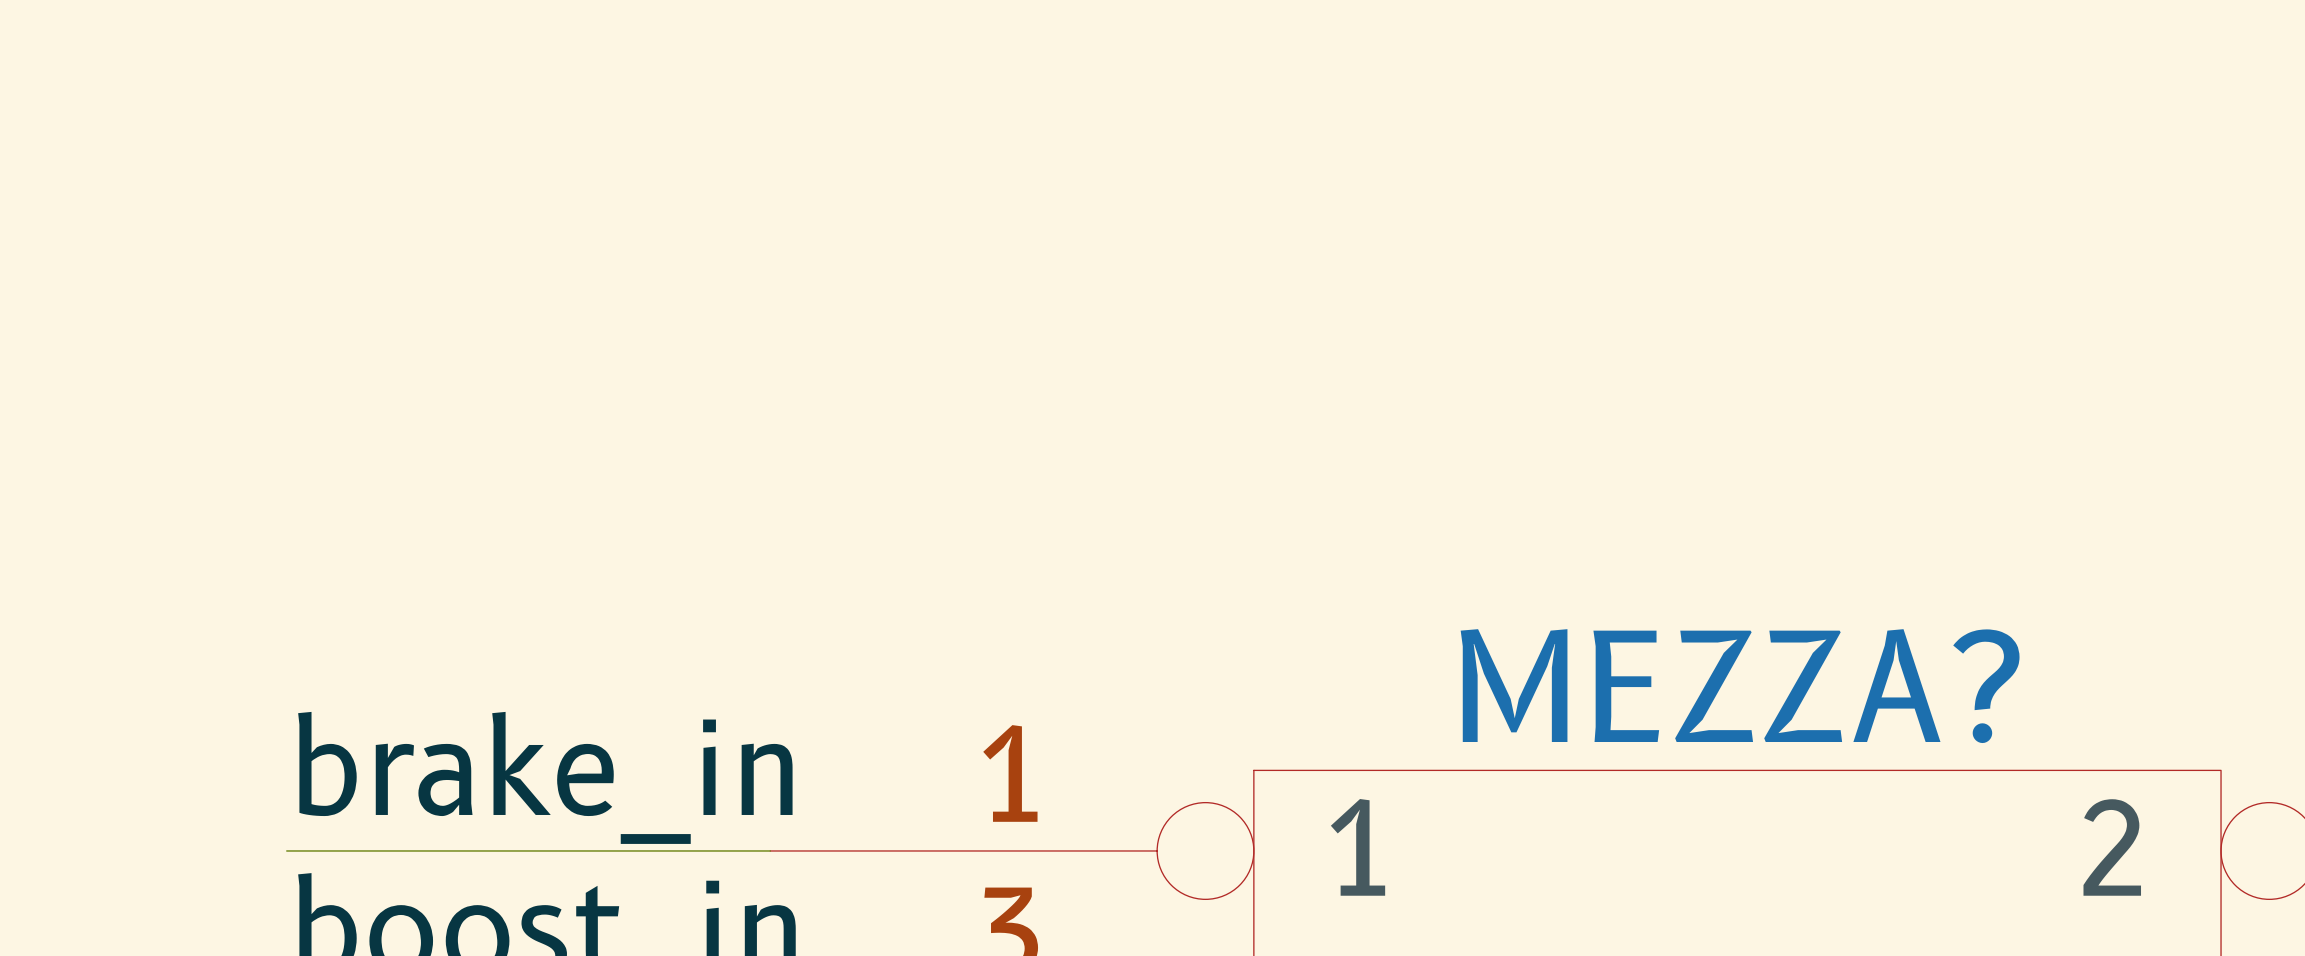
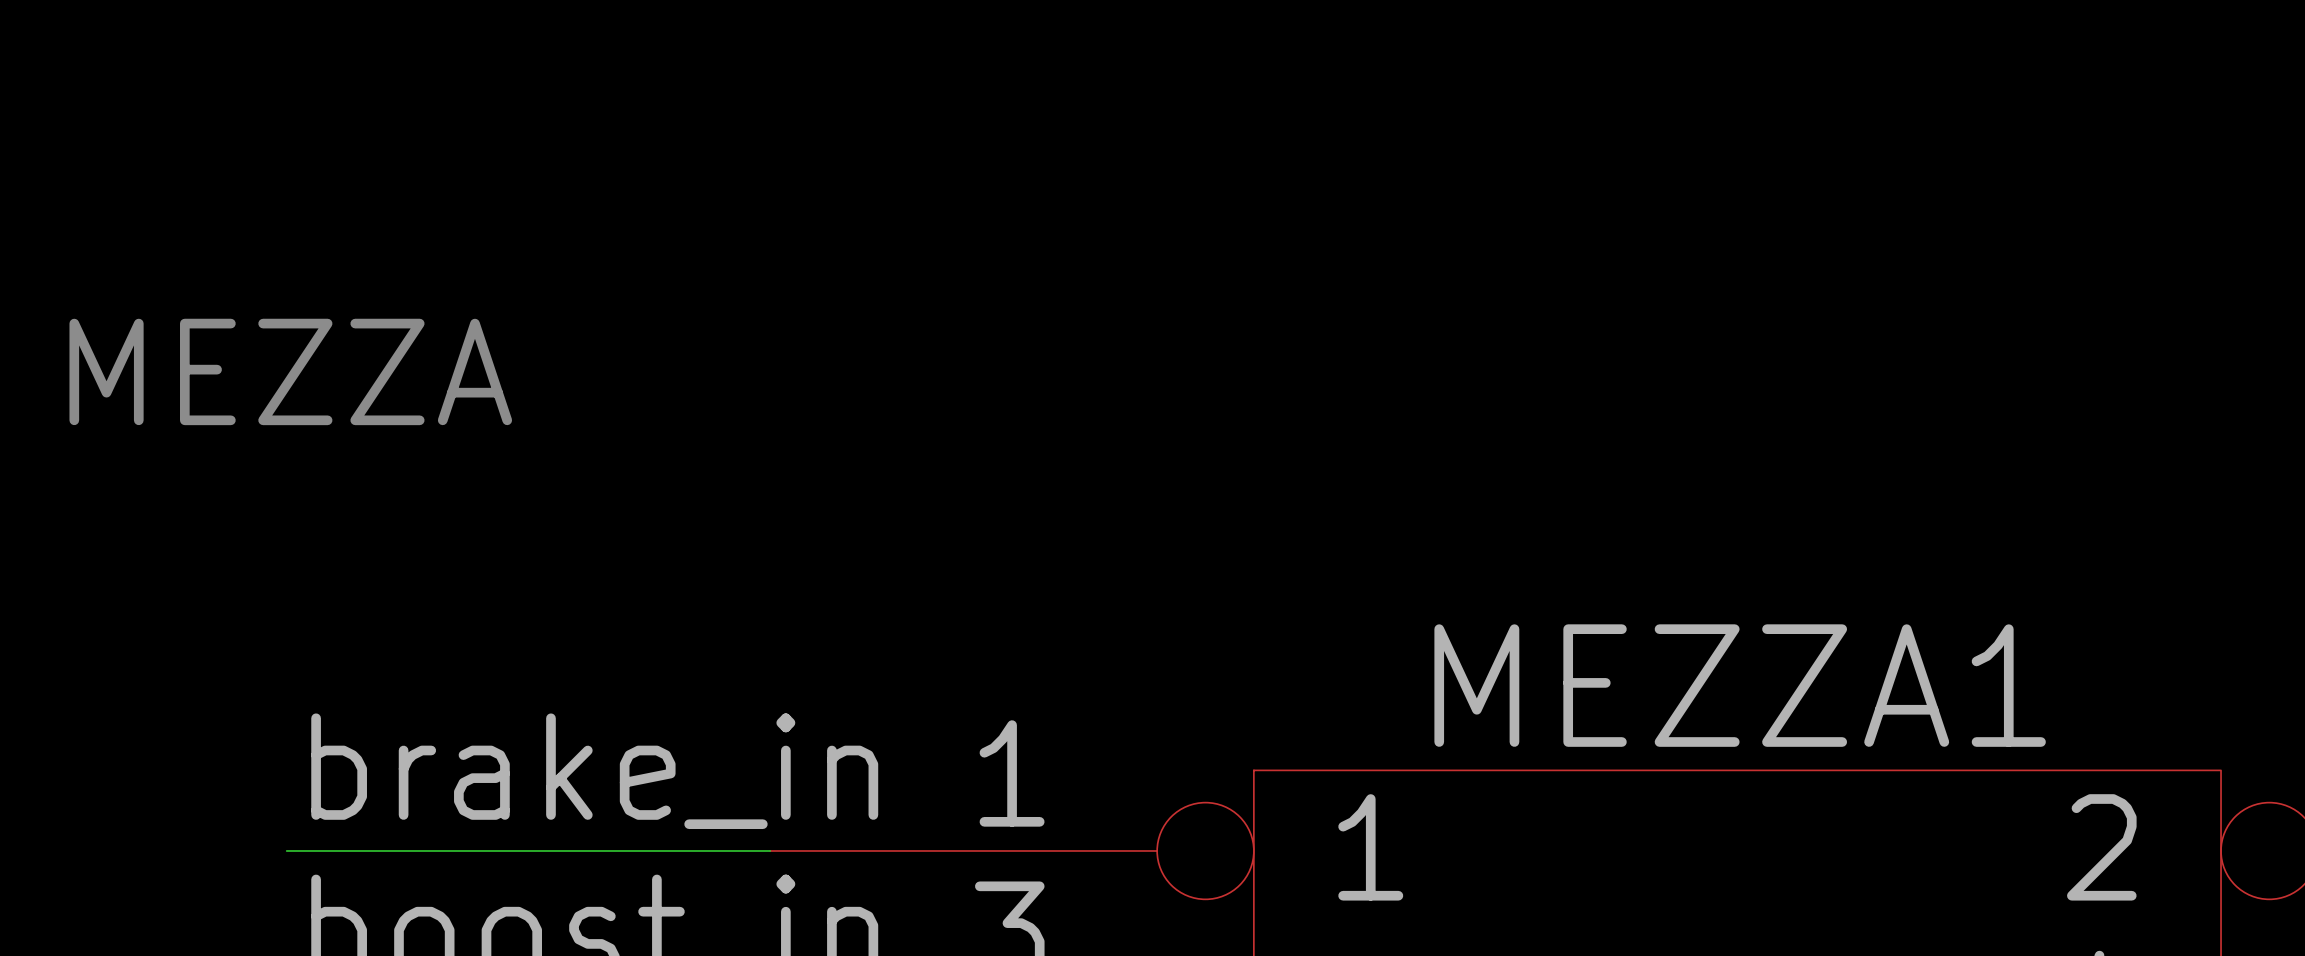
text: none -> MEZZA (290, 371)
MEZZA? name: MEZZA? (1740, 686) -> MEZZA1 (1740, 685)

